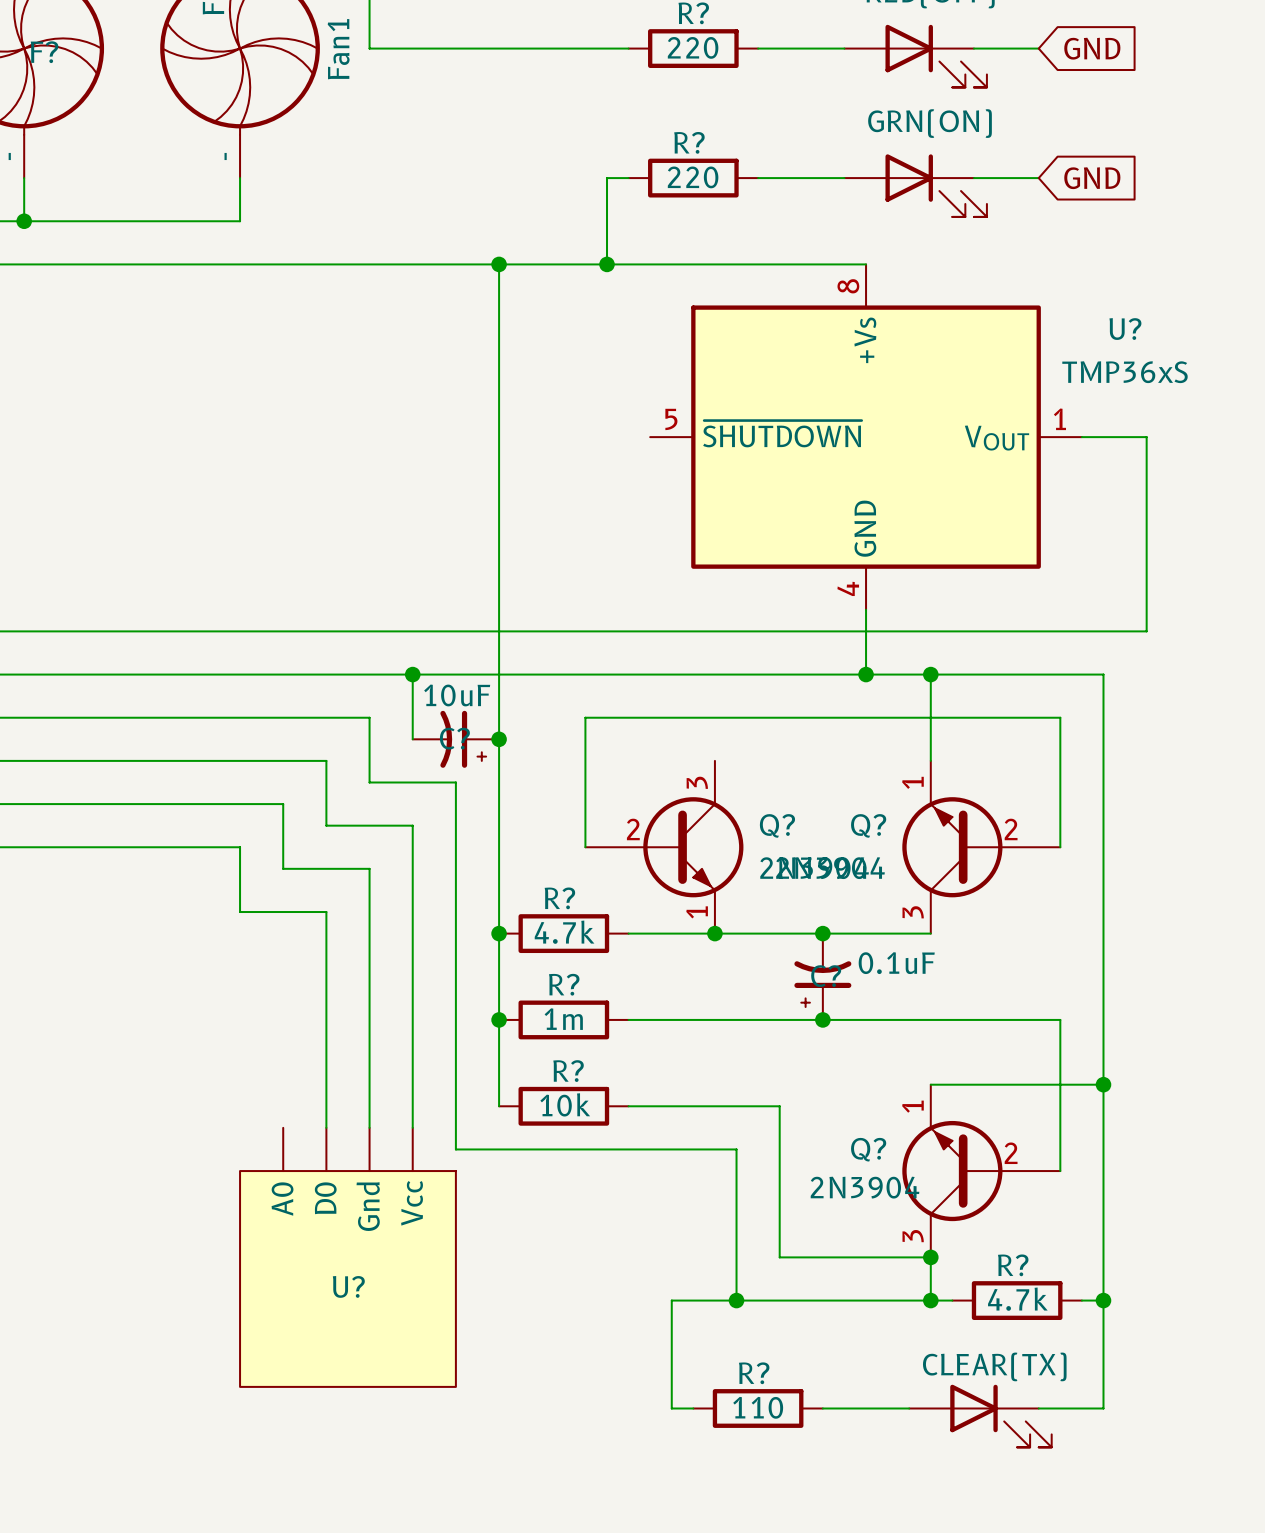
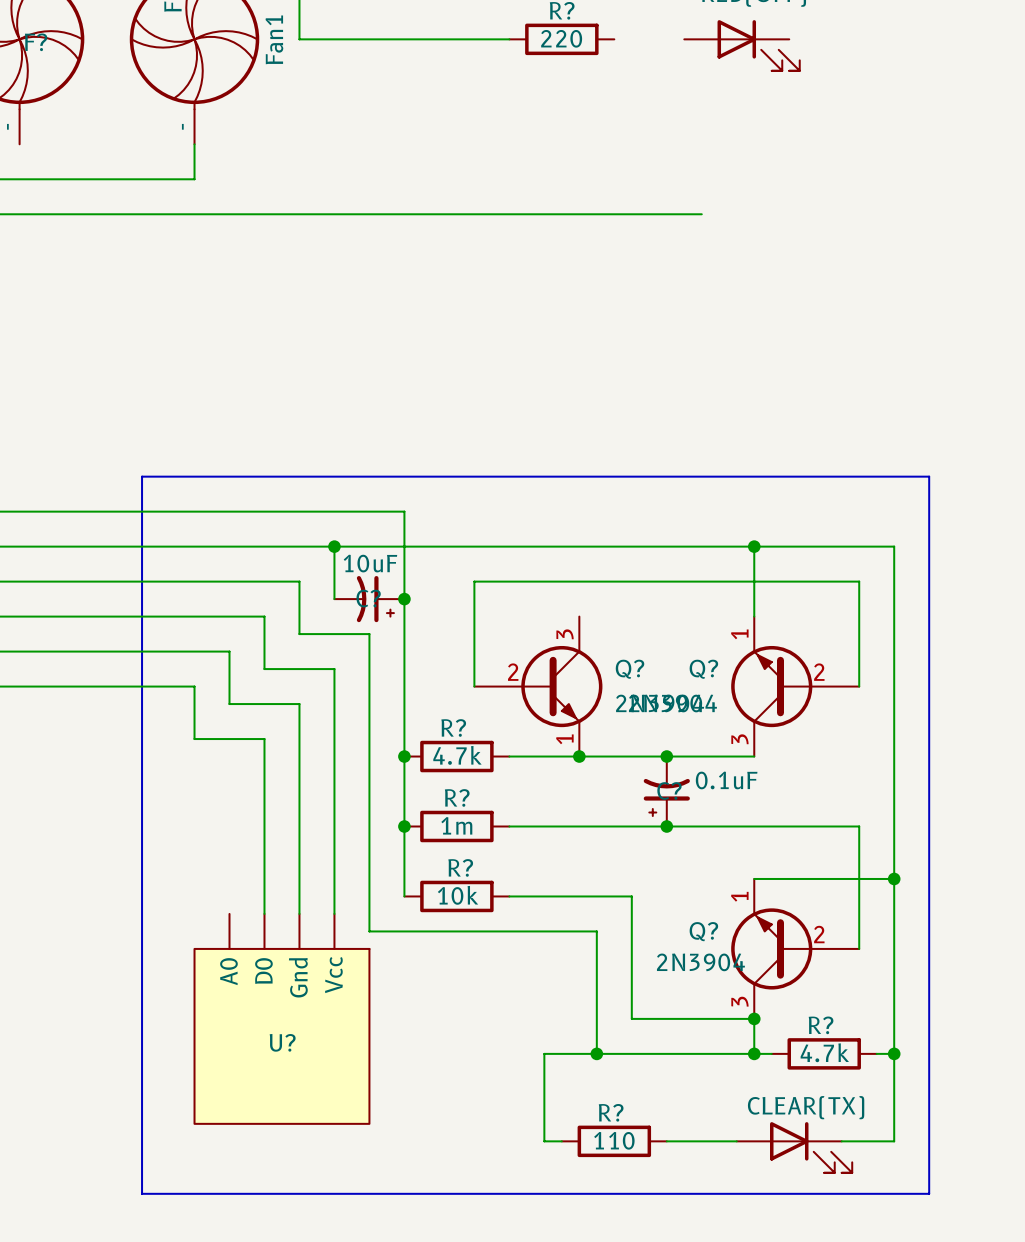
wire: (758, 48) (844, 48) -> none
wire: (973, 48) (1038, 48) -> none
global label: GND (1092, 48) -> none
wire: (24, 178) (24, 221) -> none
wire: (628, 178) (607, 178) (607, 264) -> none
R?: 220 (693, 178) -> none
wire: (758, 178) (844, 178) -> none
wire: (973, 178) (1038, 178) -> none
global label: GND (1092, 178) -> none
part: GRN(ON) (915, 185) -> none
junction: (24, 221) -> none
wire: (499, 264) (499, 631) (1146, 631) (1146, 437) (1081, 437) -> none
junction: (499, 264) -> none
junction: (607, 264) -> none
U?: TMP36xS (866, 437) -> none
line: none -> (142, 476) (929, 476) (929, 1193) (142, 1193) (142, 476)
wire: (866, 609) (866, 674) -> none
junction: (866, 674) -> none

